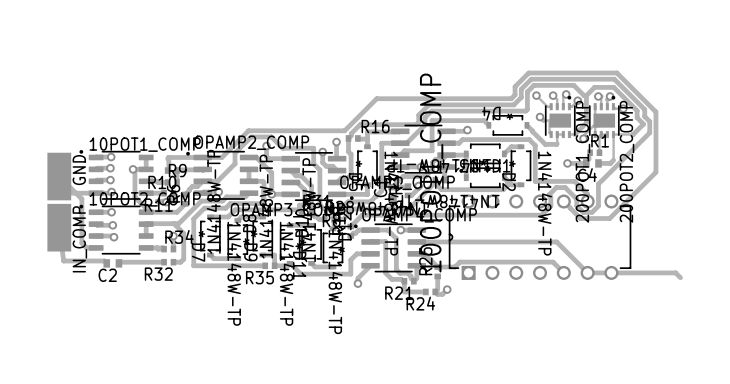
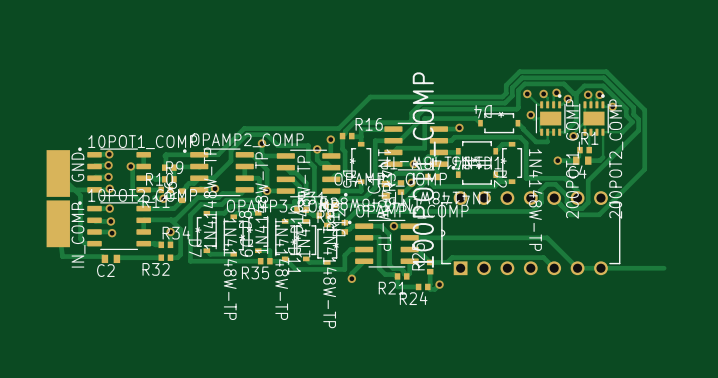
track: (675, 272) (680, 277) -> none

